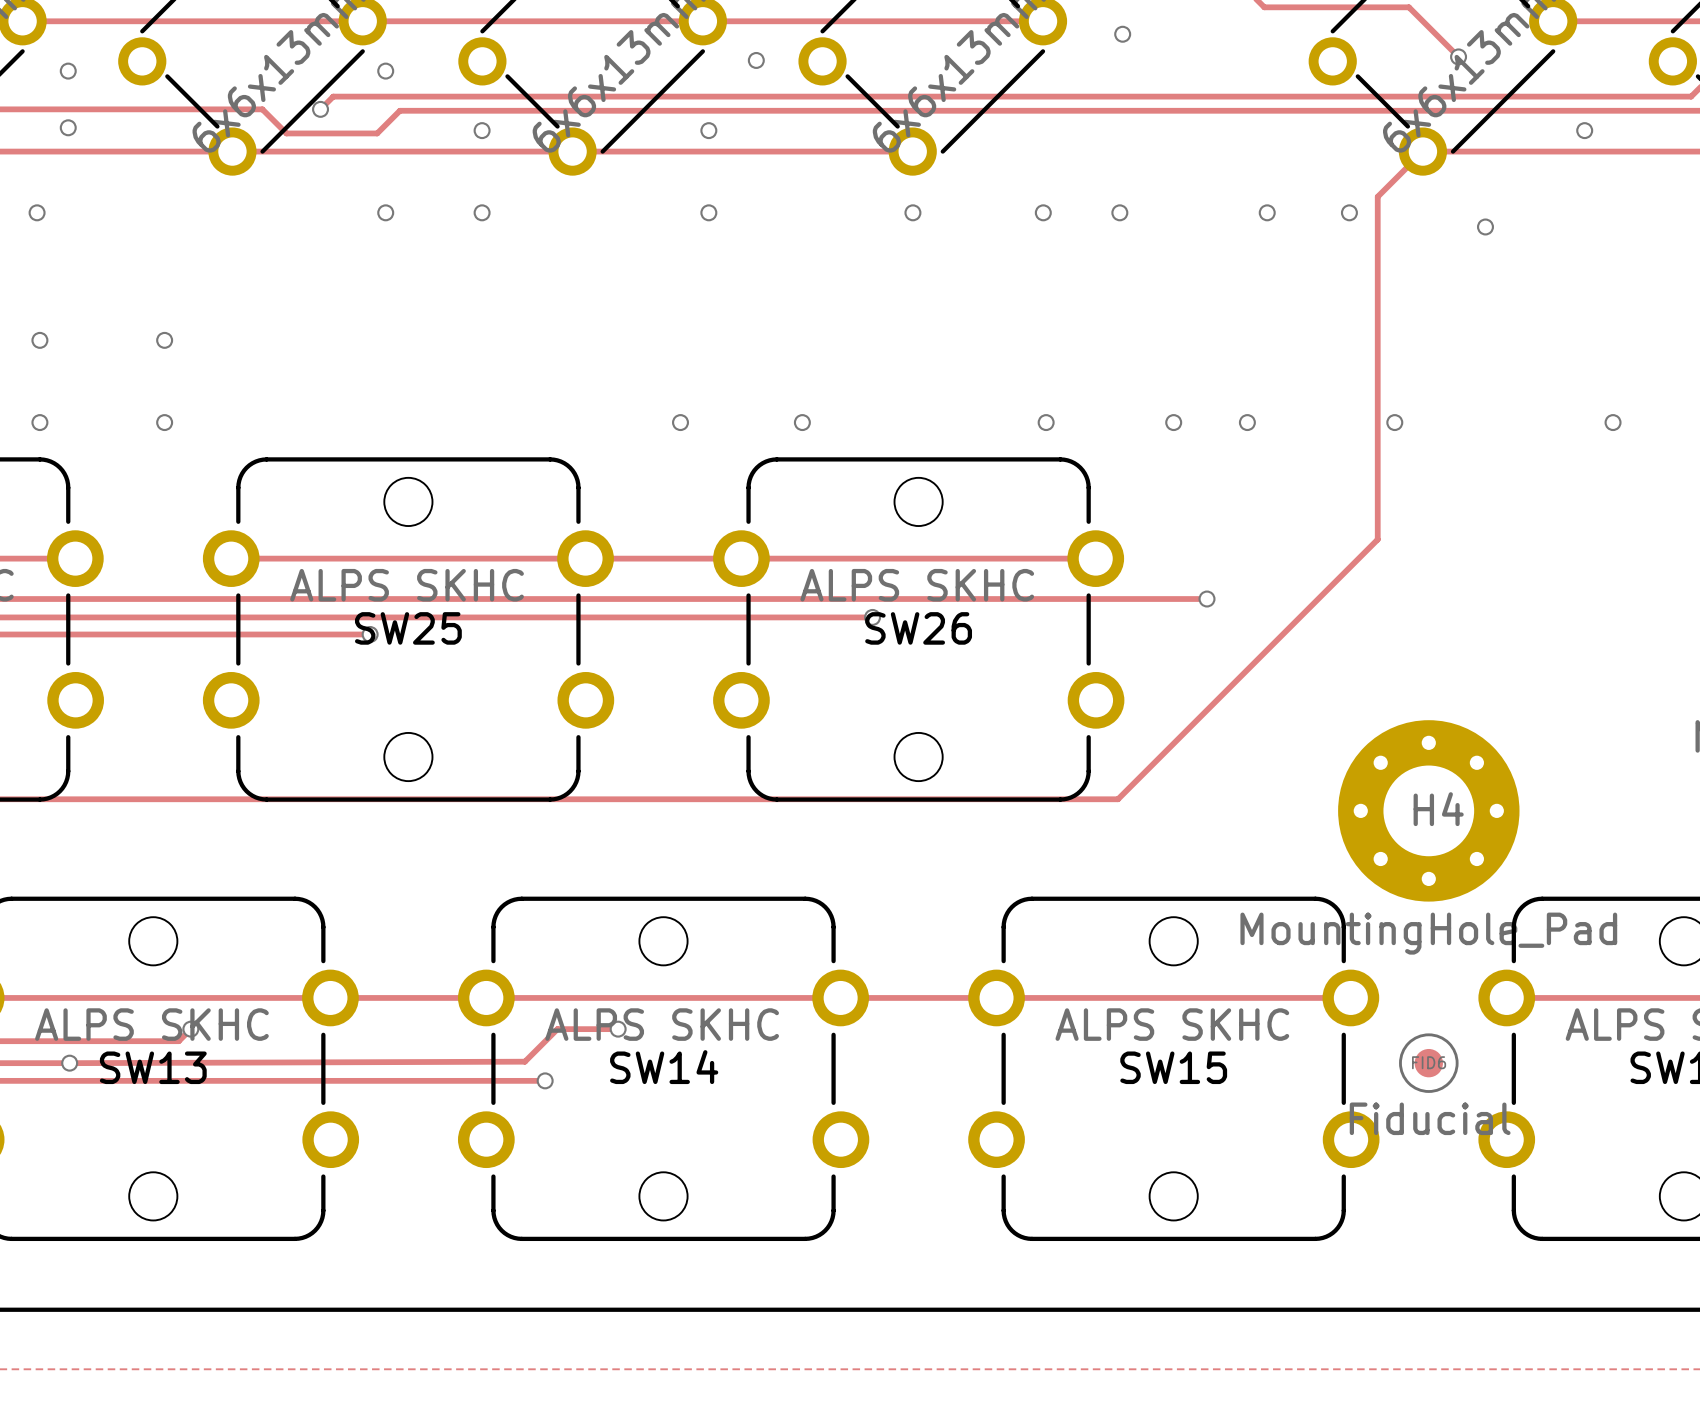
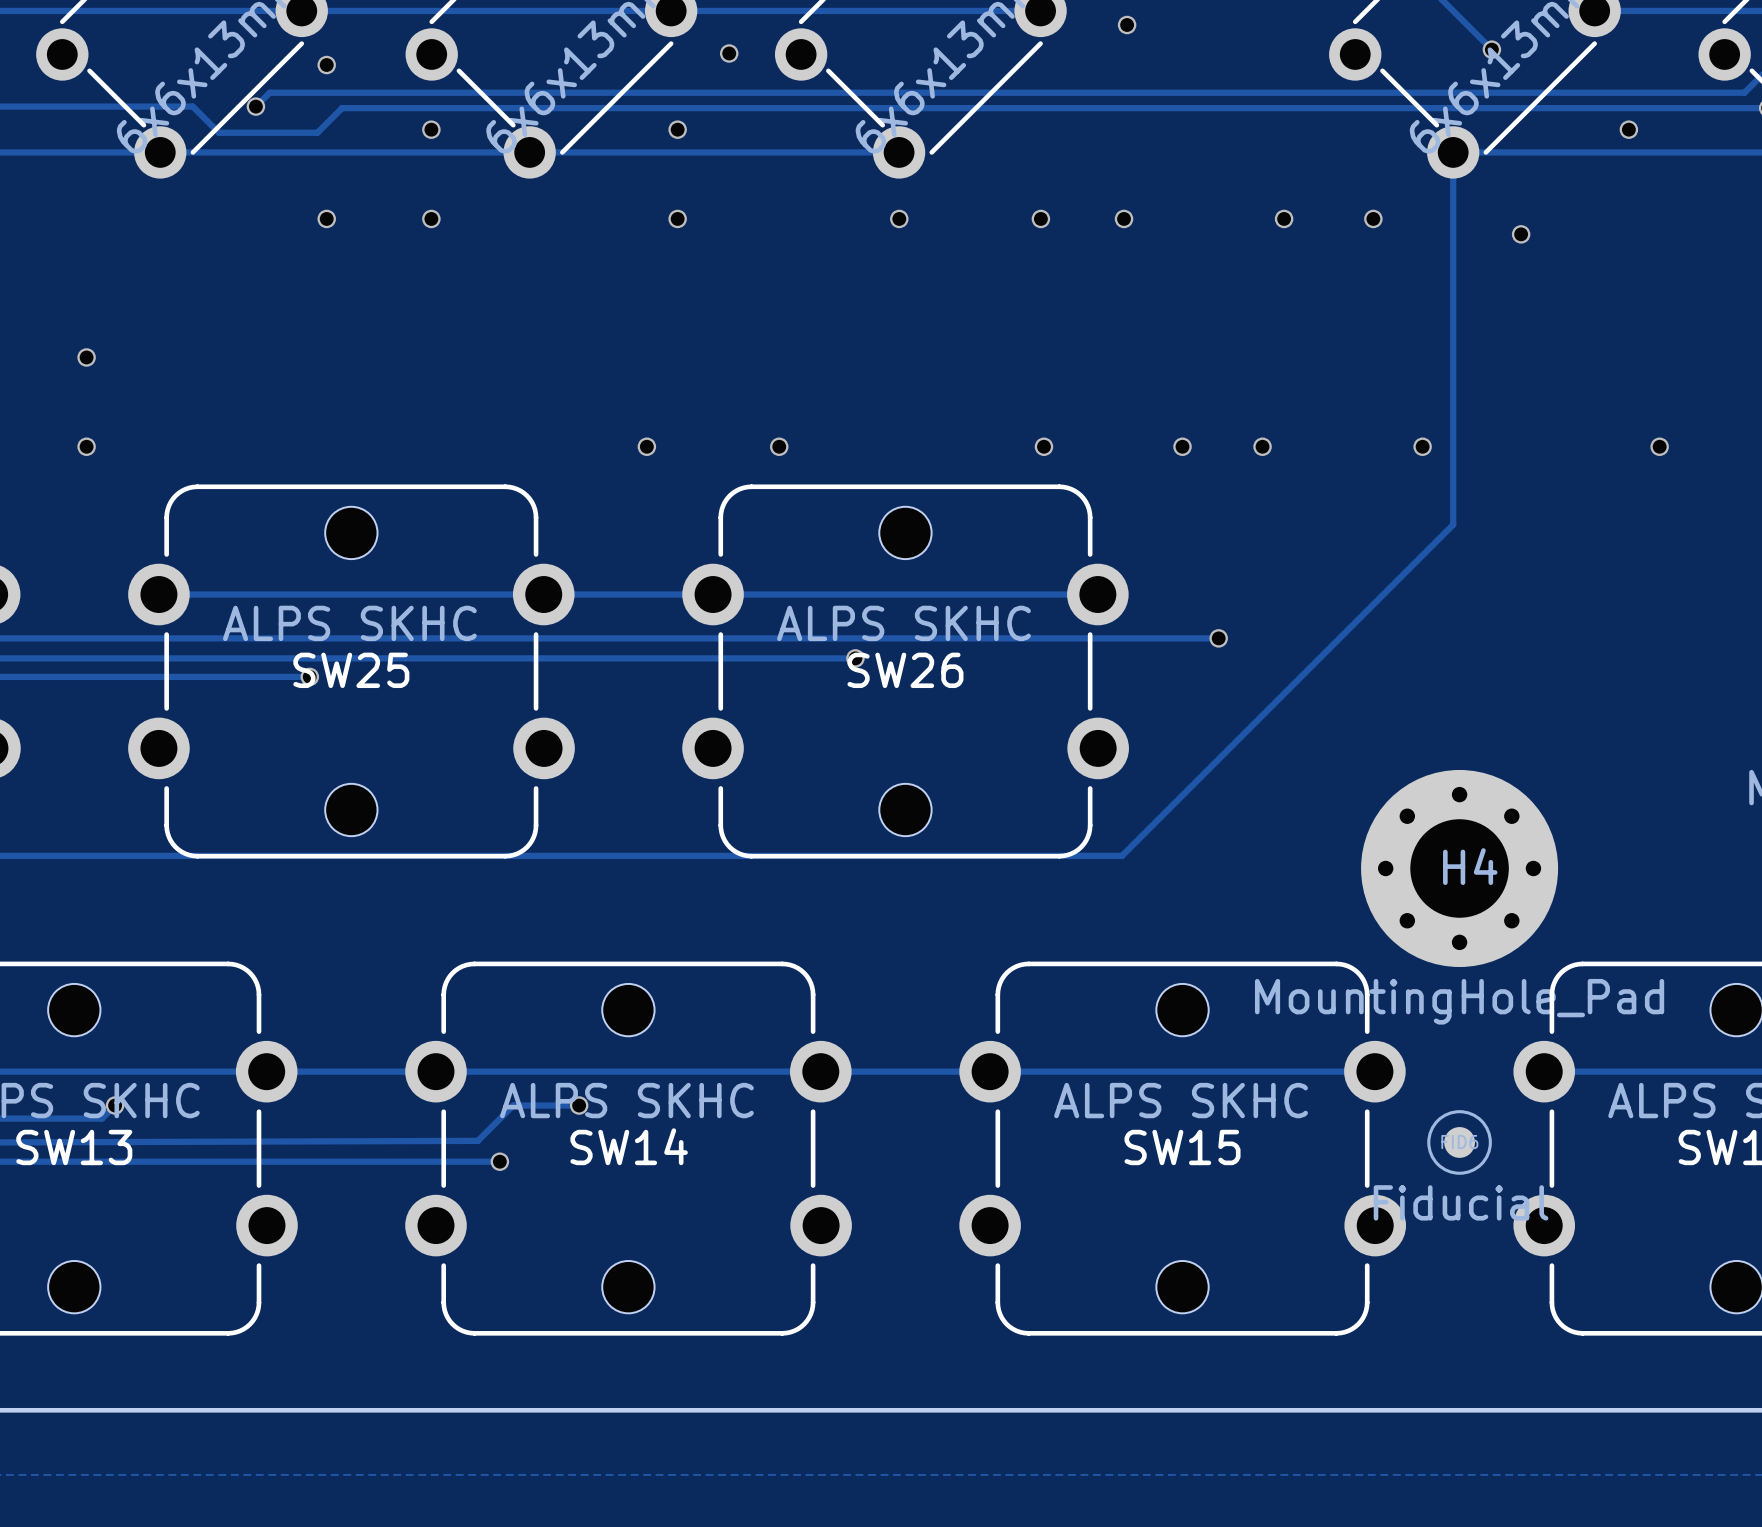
track: (1422, 151) (1377, 196) (1377, 539) -> (1453, 152) (1453, 524) (1404, 573)

